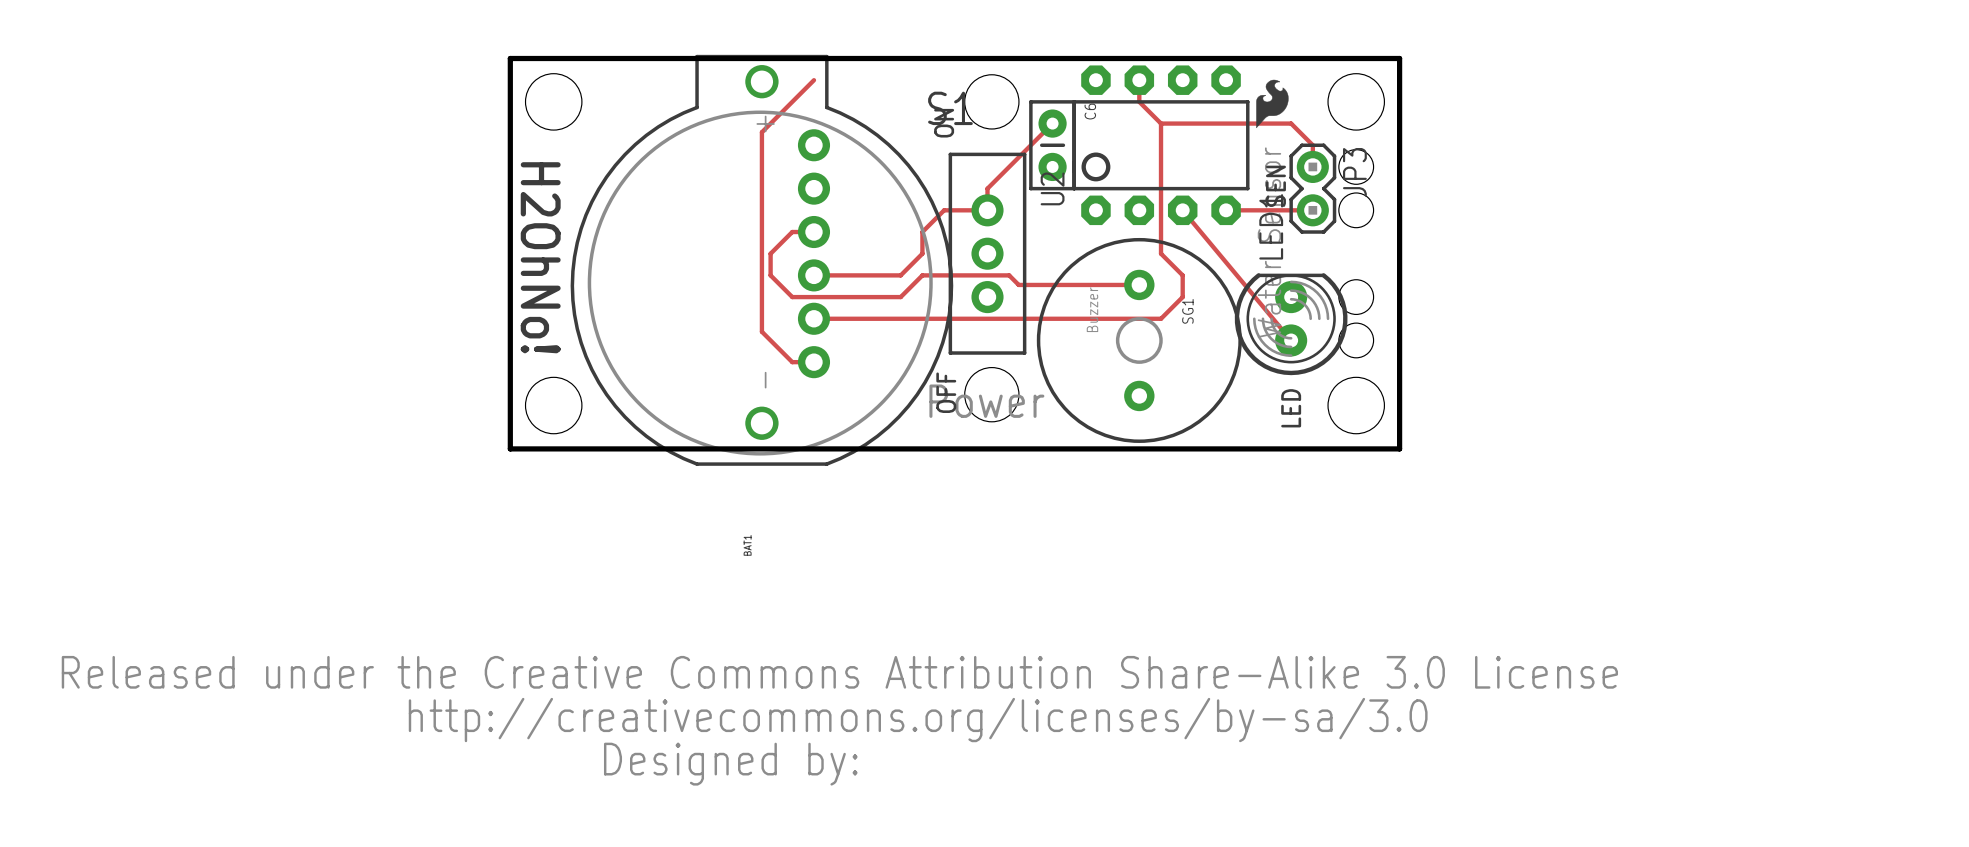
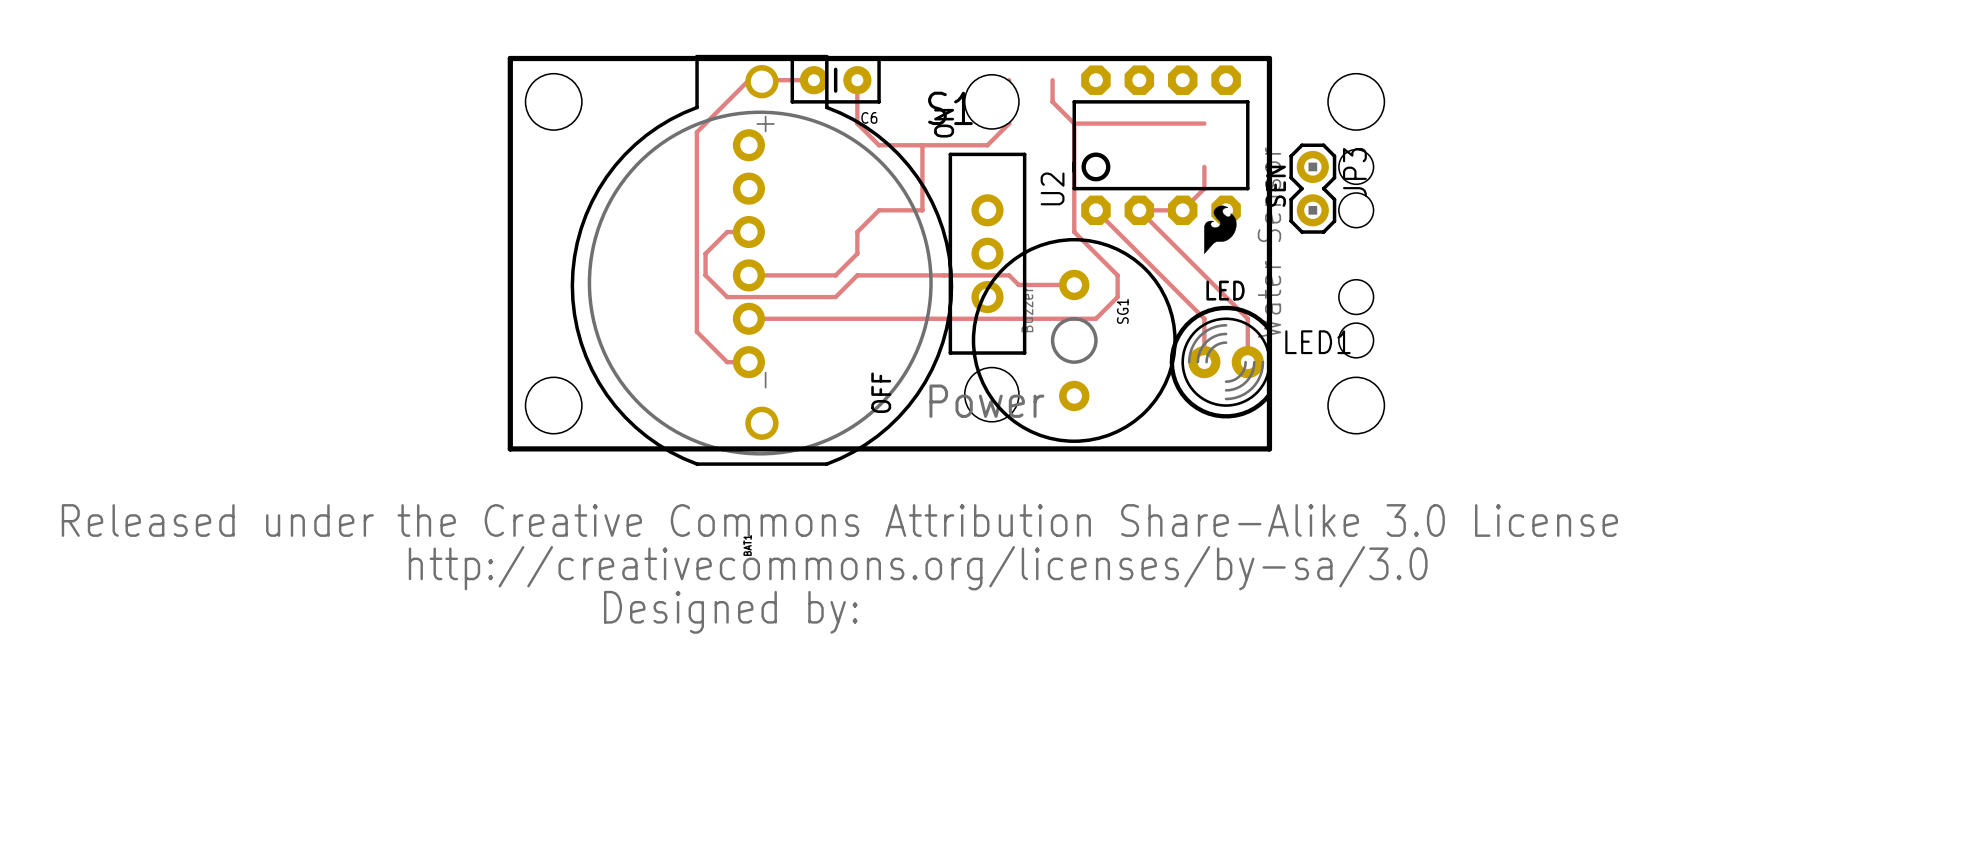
board edge: (1269, 58) (1399, 58) (1399, 448) (1269, 448) -> (1269, 58) (1269, 448)
track: (813, 80) (761, 132) (761, 331) (792, 362) (813, 362) -> (813, 80) (748, 80) (696, 132) (696, 331) (727, 362) (748, 362)
track: none -> (857, 80) (857, 123) (879, 145) (987, 145) (1009, 123) (1009, 80)
track: none -> (1052, 80) (1052, 101) (1074, 123)
track: (1139, 80) (1139, 101) (1161, 123) (1161, 253) (1182, 275) (1182, 297) (1161, 318) (1095, 318) -> (1074, 123) (1074, 232) (1117, 275) (1117, 297) (1095, 318)
drawing position: (1272, 103) -> (1220, 229)
track: (1052, 123) (987, 188) (987, 210) (944, 210) (922, 232) (922, 253) (900, 275) -> none
track: (1204, 123) (1291, 123) (1312, 145) (1312, 166) -> none
track: none -> (922, 145) (922, 210) (879, 210) (857, 232) (857, 253) (835, 275)
C6 rotation: 0° (1052, 145) -> 90° clockwise (835, 80)
C6 position: (1052, 145) -> (835, 80)
track: none -> (1204, 166) (1204, 188) (1182, 210) (1139, 210) (1247, 318) (1247, 362)
track: none -> (1095, 210) (1204, 318) (1204, 362)
track: (1182, 210) (1291, 340) -> none
track: (1226, 210) (1312, 210) -> (1074, 123) (1161, 123)
track: (813, 232) (792, 232) (770, 253) (770, 275) (792, 297) -> (748, 232) (727, 232) (705, 253) (705, 275) (727, 297) (792, 297)
part position: (813, 253) -> (748, 253)
text: H2OhNo! (540, 257) -> none
track: (835, 275) (857, 275) -> (835, 297) (857, 275)
track: (922, 275) (900, 297) (835, 297) -> (922, 275) (900, 275)
track: (1074, 284) (1139, 284) -> (748, 275) (813, 275)
track: none -> (748, 318) (813, 318)
LED1 rotation: 0° (1291, 324) -> 90° clockwise (1220, 362)
LED1 position: (1291, 324) -> (1220, 362)
SG1 position: (1139, 340) -> (1074, 340)
text position: OFF (946, 392) -> OFF (881, 392)
text rotation: 0° (1291, 408) -> 90° clockwise (1225, 290)
text position: LED (1291, 408) -> LED (1225, 290)
drawing position: (839, 720) -> (839, 568)

